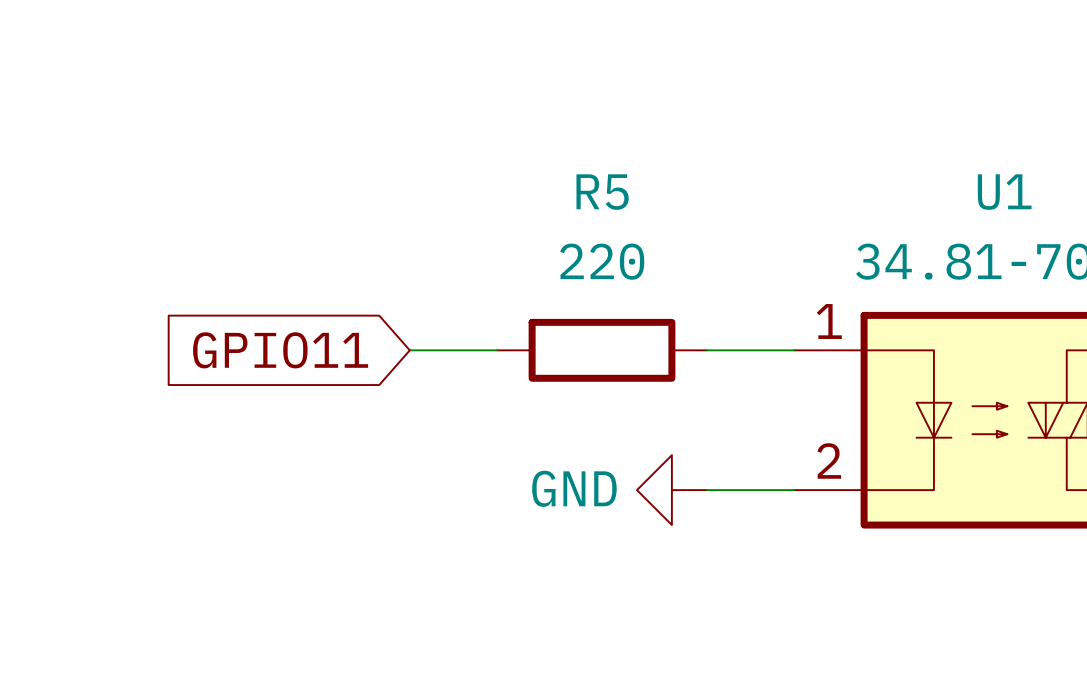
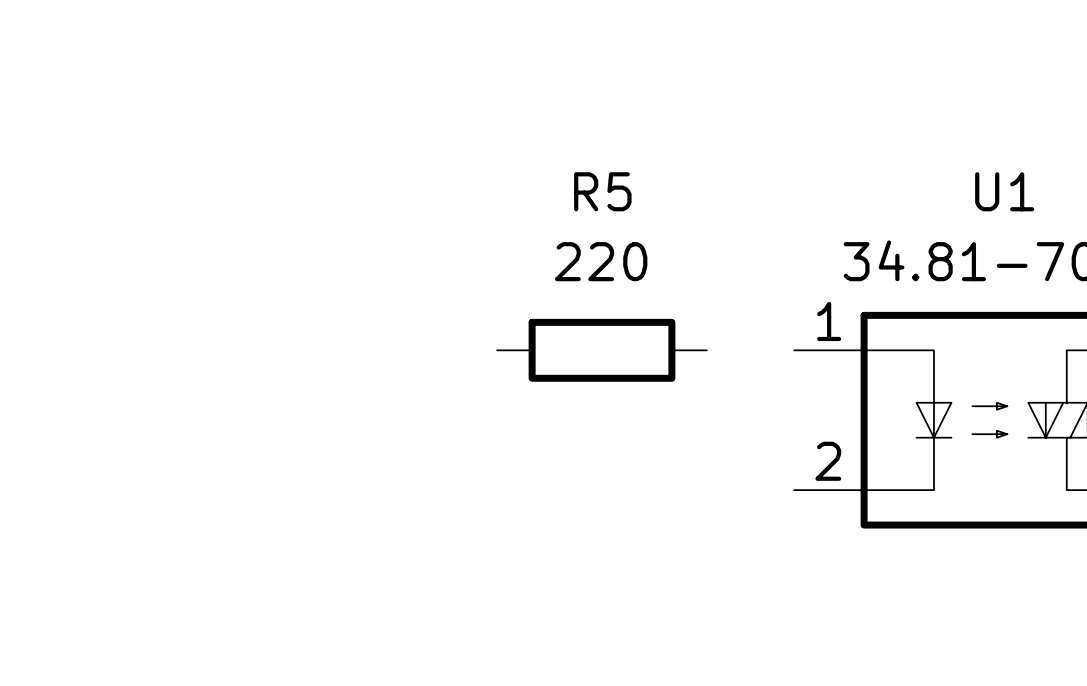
global label: GPIO11 (280, 350) -> none
wire: (409, 350) (497, 350) -> none
wire: (706, 350) (794, 350) -> none
power symbol: GND (671, 490) -> none
wire: (706, 490) (794, 490) -> none

